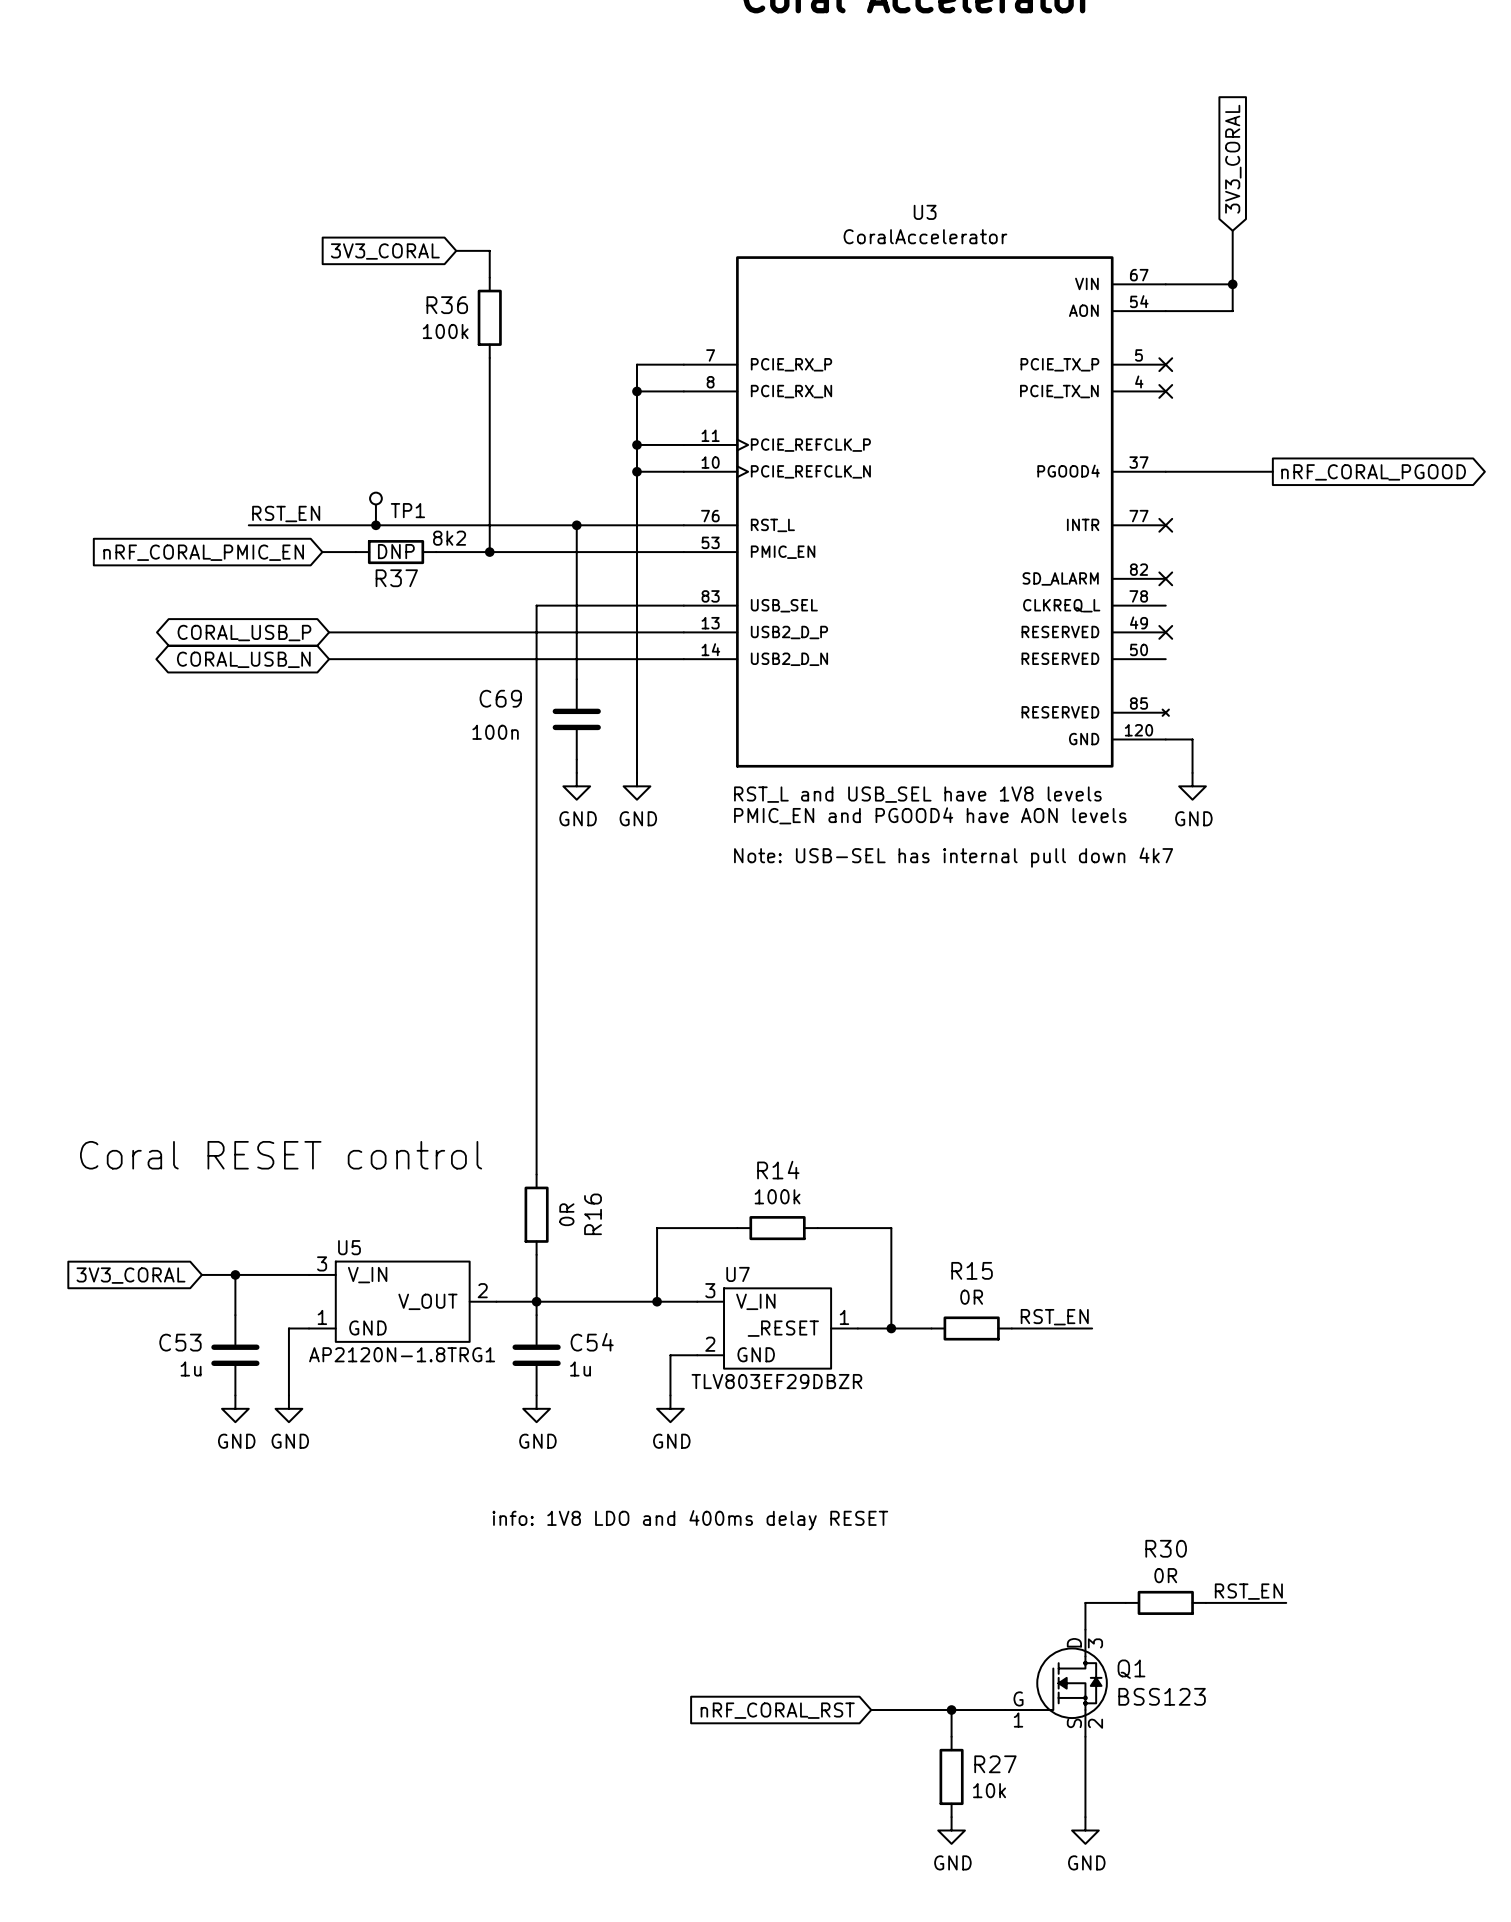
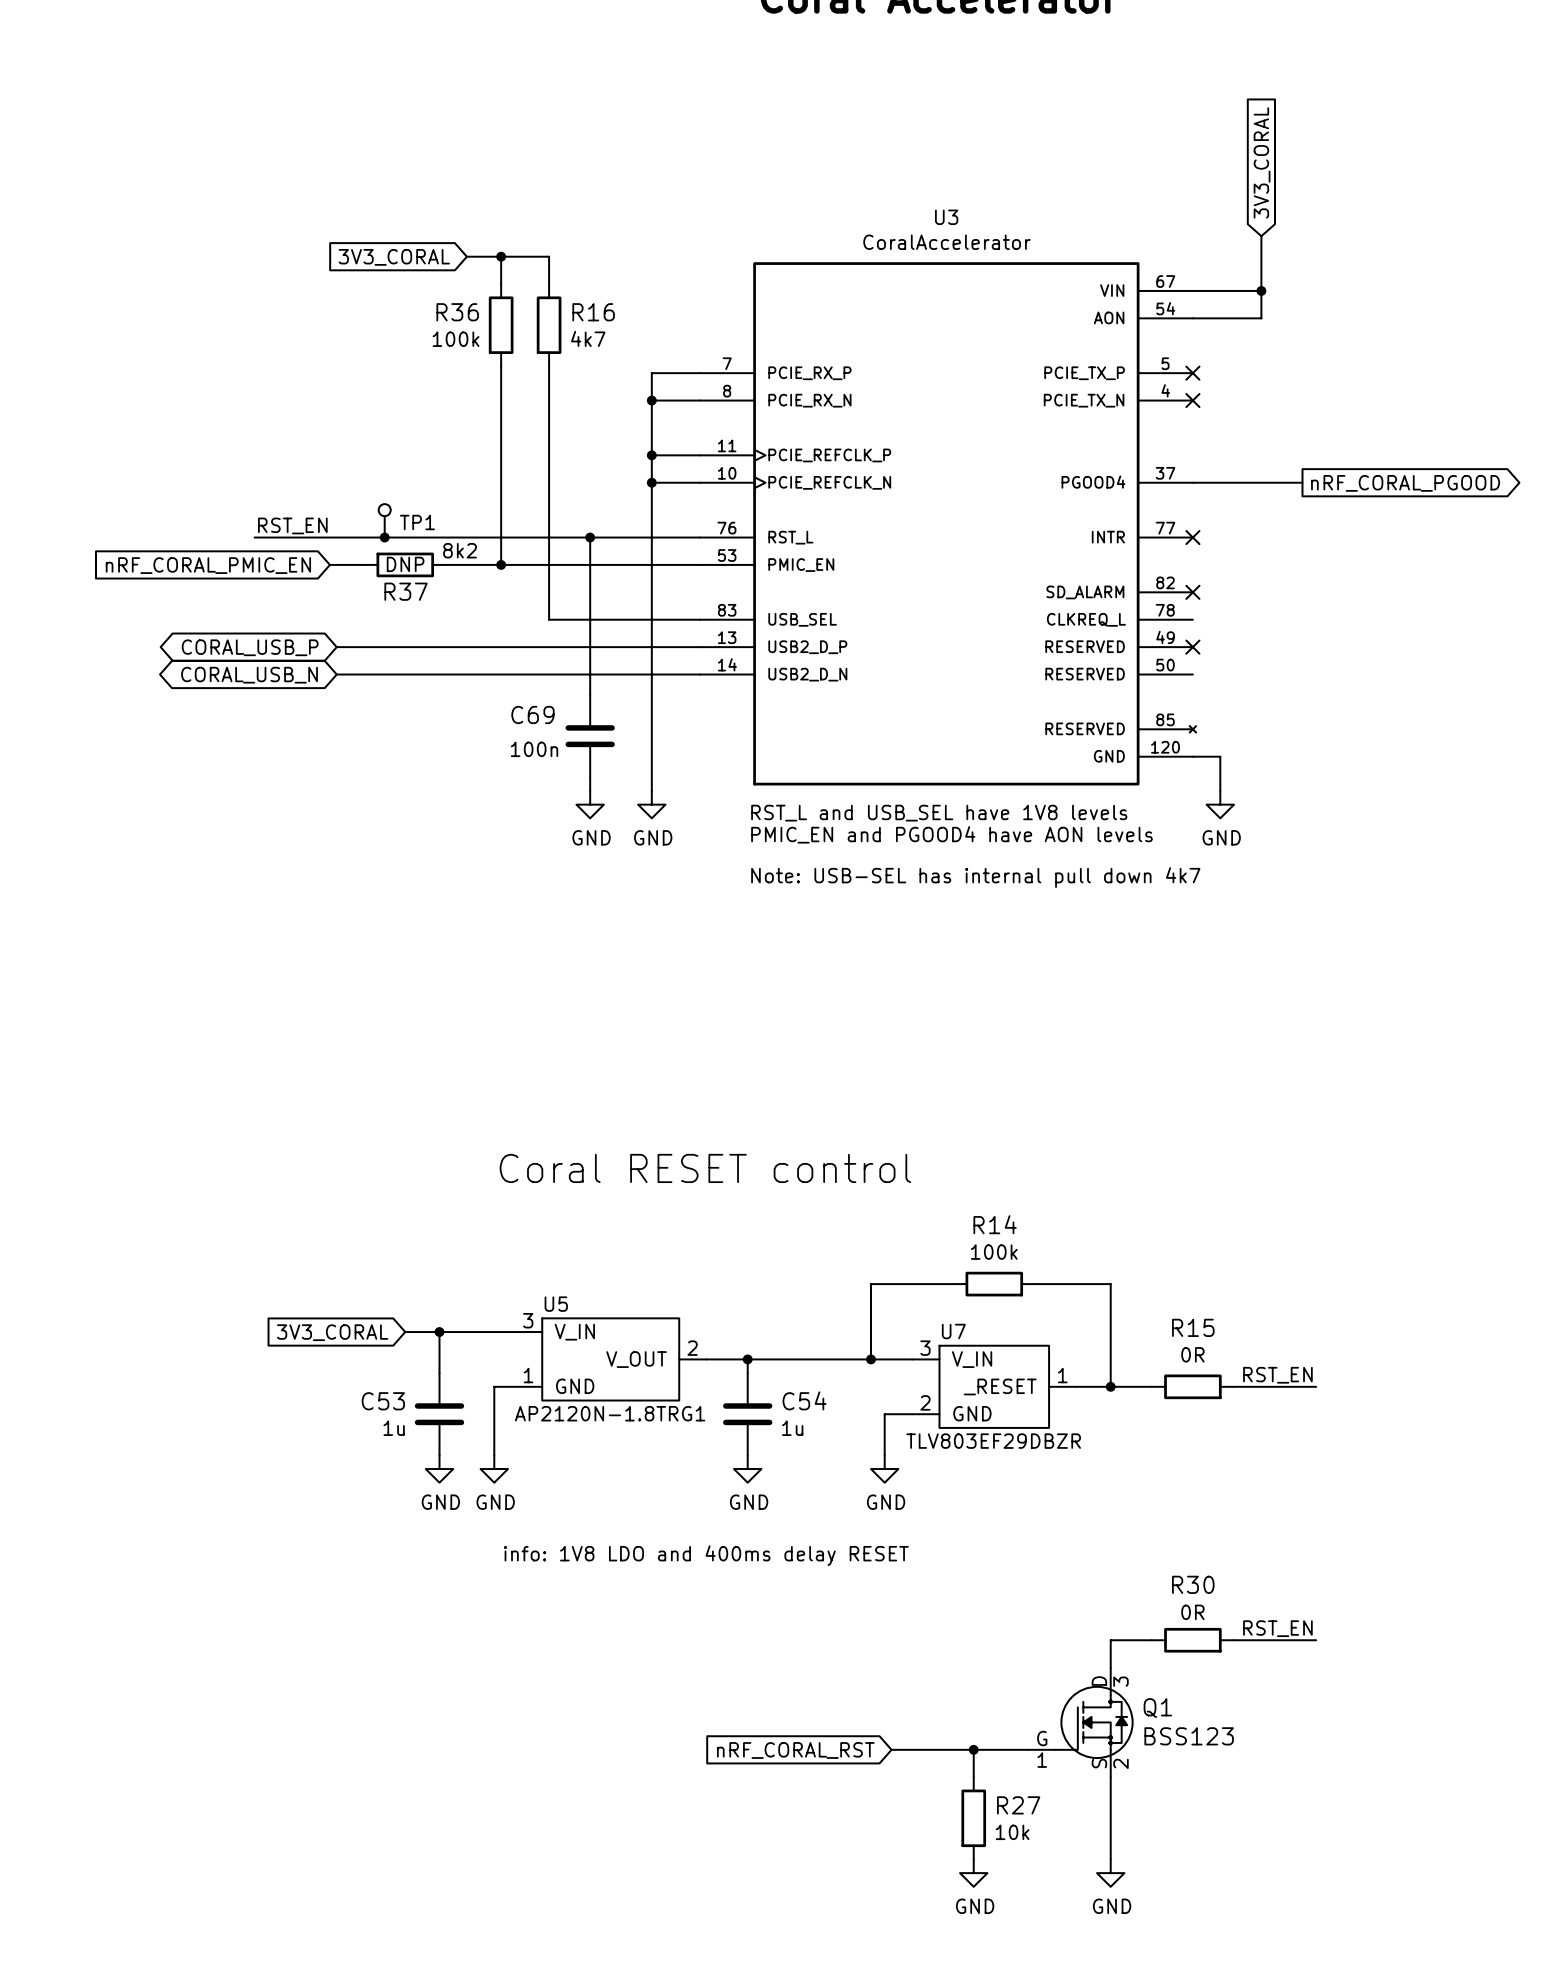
wire: none -> (501, 256) (549, 256) (549, 284)
junction: none -> (501, 256)
wire: (536, 605) (536, 1174) -> (549, 619) (549, 366)
C69 name position: C69 (500, 698) -> C69 (532, 714)
C69 text position: 100n (495, 732) -> 100n (534, 749)
text: none -> Coral RESET control (705, 1168)
text: Coral RESET control (281, 1155) -> none
R16 position: (536, 1214) -> (549, 325)
R16 text: 0R (566, 1214) -> 4k7 (588, 338)
R16 name rotation: 0° (593, 1214) -> 90° clockwise (593, 312)
wire: (737, 1228) (657, 1228) (657, 1301) -> (953, 1284) (871, 1284) (871, 1359)
R14 position: (777, 1228) -> (994, 1284)
wire: (817, 1228) (891, 1228) (891, 1328) (931, 1328) -> none
wire: (536, 1254) (536, 1315) -> none
wire: none -> (1035, 1284) (1110, 1284) (1110, 1386)
wire: (201, 1274) (309, 1274) -> none
wire: (235, 1274) (235, 1315) -> (439, 1332) (439, 1373)
junction: (235, 1274) -> none
global label position: 3V3_CORAL (130, 1275) -> 3V3_CORAL (332, 1332)
wire: none -> (405, 1332) (507, 1332)
U5 position: (402, 1301) -> (610, 1359)
junction: none -> (439, 1332)
wire: (503, 1301) (697, 1301) -> none
junction: (536, 1301) -> none
junction: (657, 1301) -> none
label position: RST_EN (1054, 1317) -> RST_EN (1277, 1375)
wire: (309, 1328) (288, 1328) (288, 1395) -> (514, 1386) (494, 1386) (494, 1455)
wire: none -> (706, 1359) (877, 1359)
wire: none -> (747, 1359) (747, 1373)
junction: none -> (747, 1359)
U7 position: (777, 1328) -> (994, 1386)
junction position: (891, 1328) -> (871, 1359)
R15 position: (971, 1328) -> (1192, 1386)
wire: (1011, 1328) (1092, 1328) -> (1234, 1386) (1316, 1386)
C53 position: (235, 1355) -> (439, 1414)
C54 position: (536, 1355) -> (747, 1414)
wire: (697, 1355) (670, 1355) (670, 1395) -> (912, 1414) (884, 1414) (884, 1455)
wire: none -> (1076, 1386) (1151, 1386)
junction: none -> (1110, 1386)
power symbol: GND (235, 1408) -> none
power symbol: GND (288, 1408) -> none
power symbol: GND (536, 1408) -> none
power symbol position: GND (670, 1408) -> GND (747, 1469)
power symbol: none -> GND (439, 1469)
power symbol: none -> GND (494, 1469)
power symbol: none -> GND (884, 1469)

